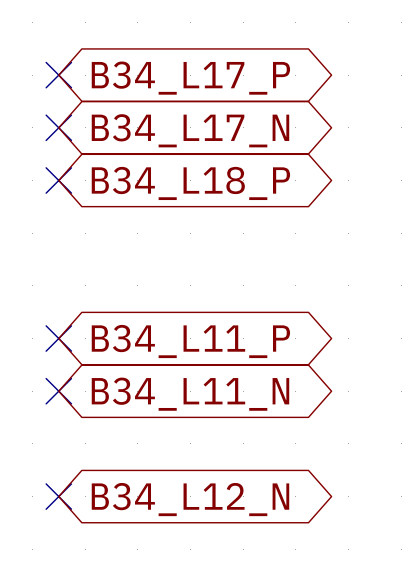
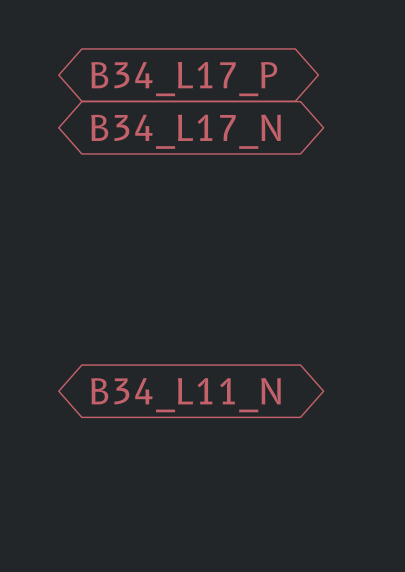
no-connect mark: (58, 75) -> none
no-connect mark: (58, 127) -> none
no-connect mark: (58, 180) -> none
global label: B34_L18_P (190, 183) -> none
no-connect mark: (58, 338) -> none
global label: B34_L11_P (190, 341) -> none
no-connect mark: (58, 391) -> none
no-connect mark: (58, 496) -> none
global label: B34_L12_N (190, 499) -> none

